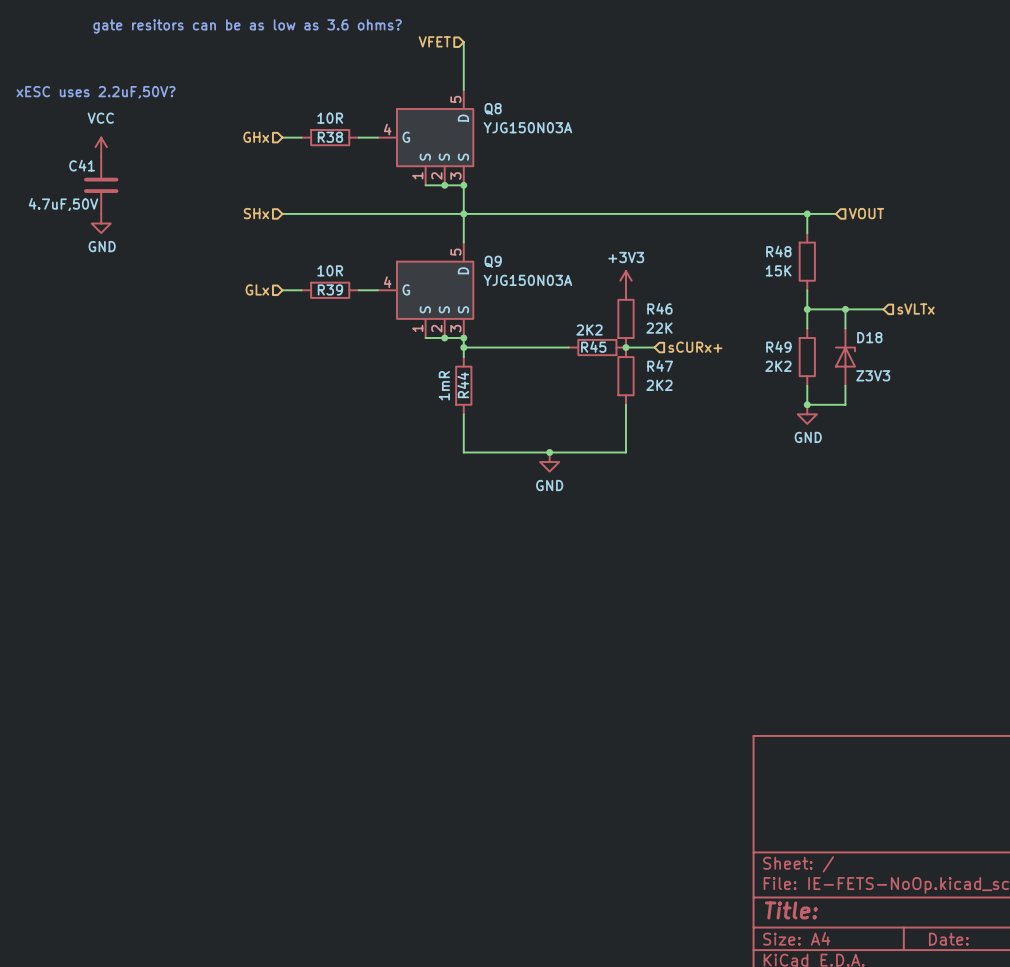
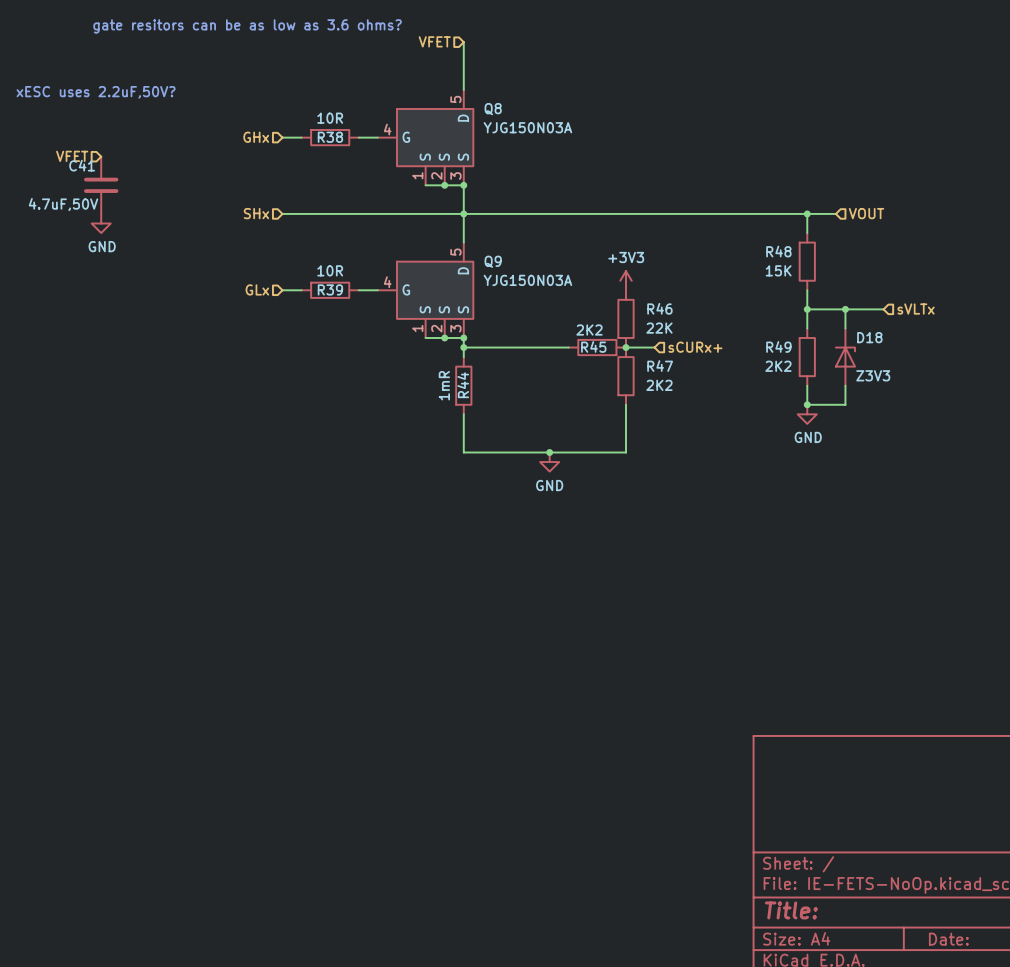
power symbol: VCC (101, 147) -> none
hierarchical label: none -> VFET (72, 156)

